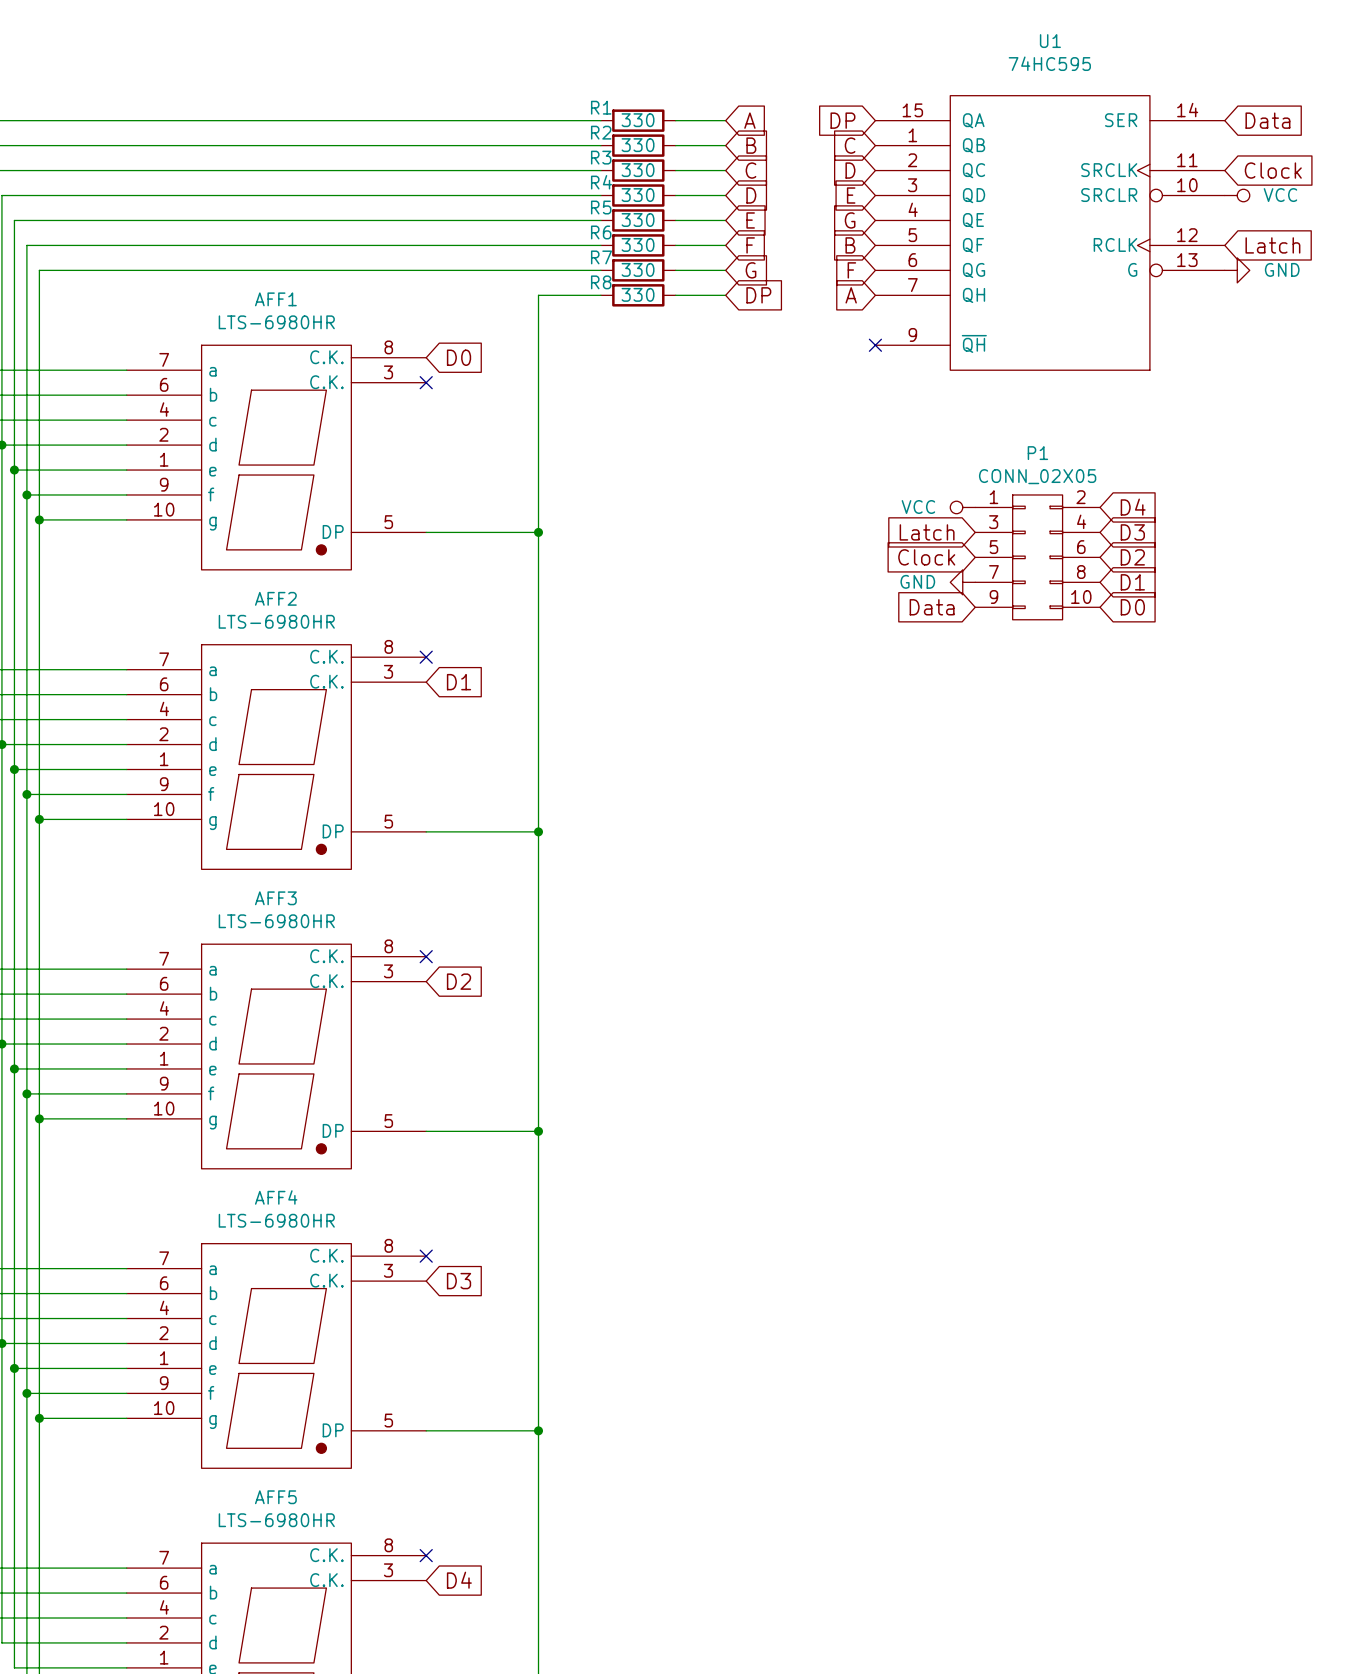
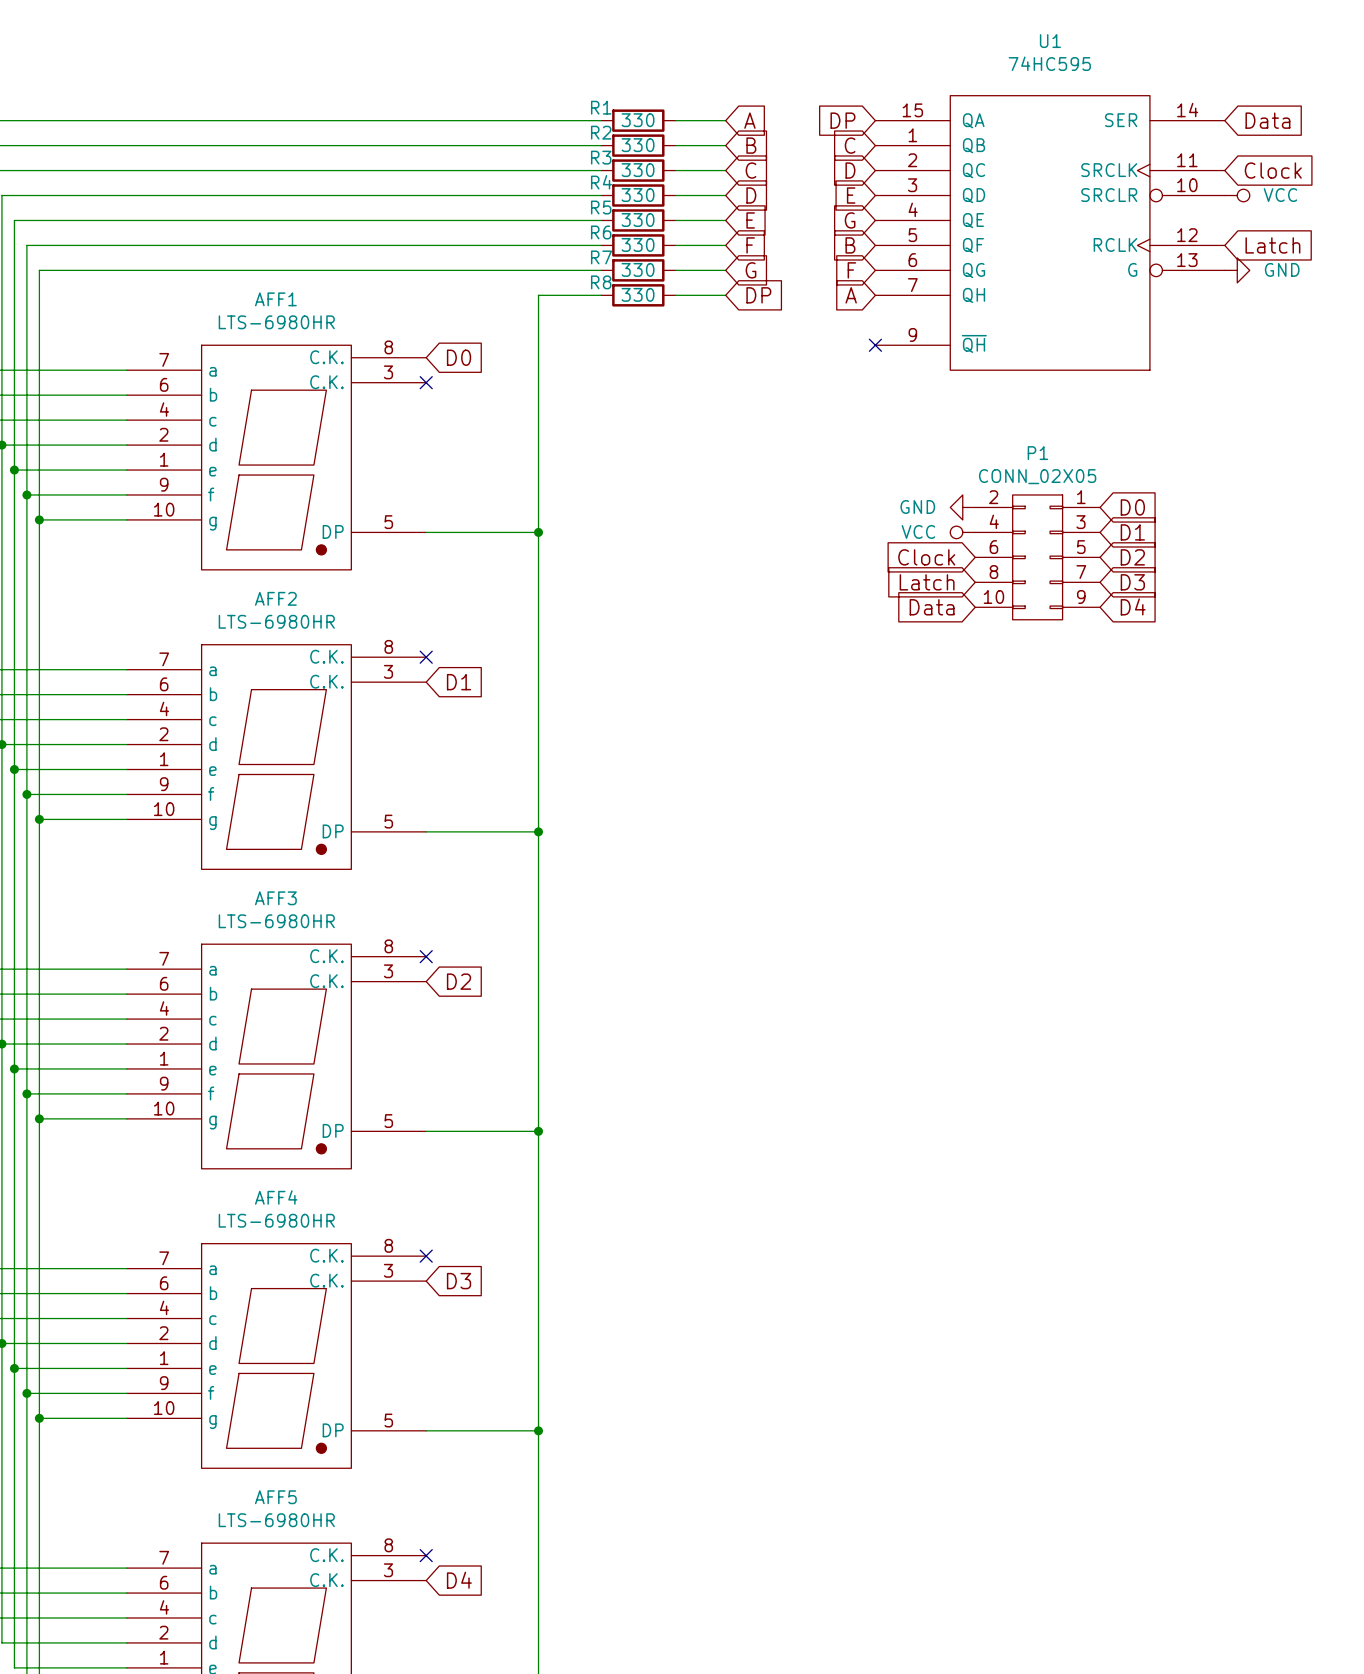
power symbol: VCC (962, 507) -> GND (962, 507)
global label: D4 (1133, 507) -> D0 (1132, 507)
global label position: Latch (927, 532) -> Latch (927, 582)
power symbol: none -> VCC (962, 532)
global label: D3 (1132, 532) -> D1 (1132, 532)
P1 flip: as is (1037, 557) -> left-right (1037, 557)
power symbol: GND (962, 582) -> none
global label: D1 (1132, 582) -> D3 (1132, 582)
global label: D0 (1132, 607) -> D4 (1133, 606)

